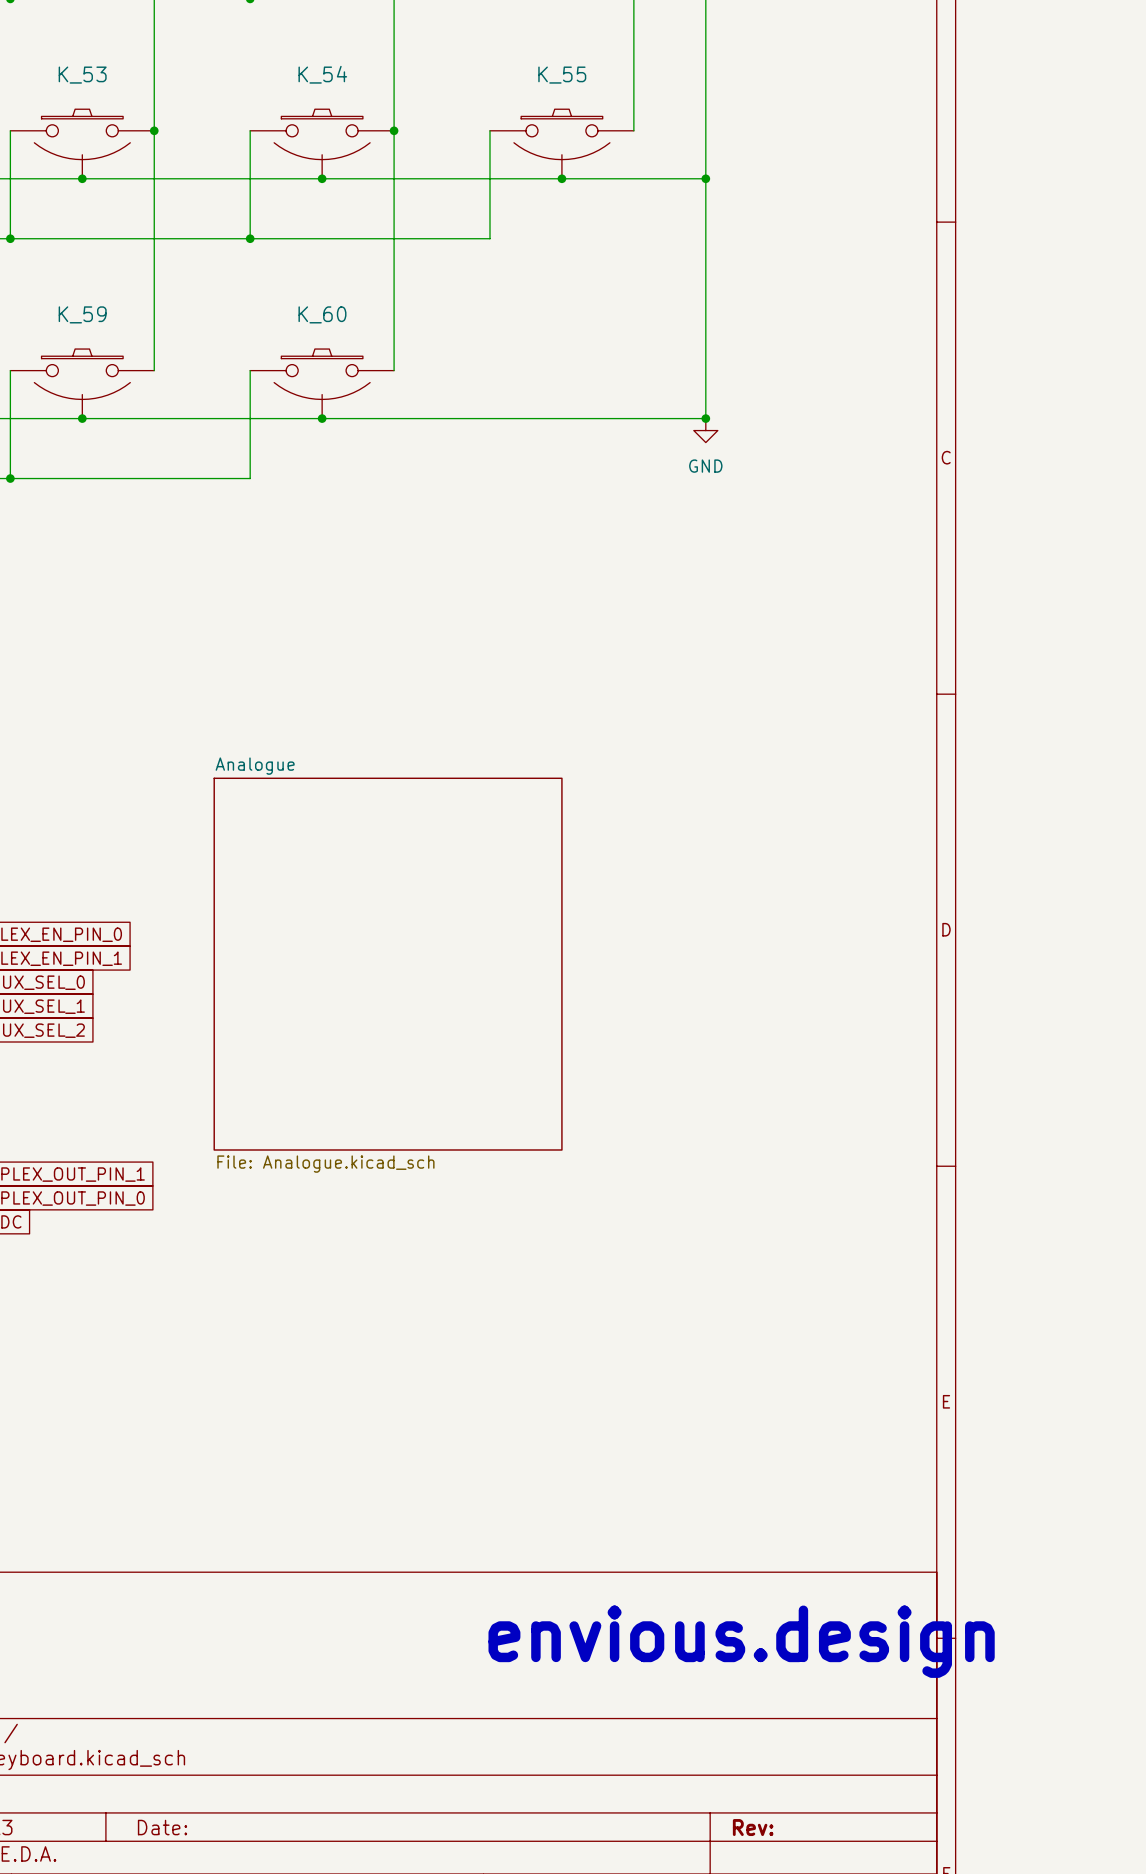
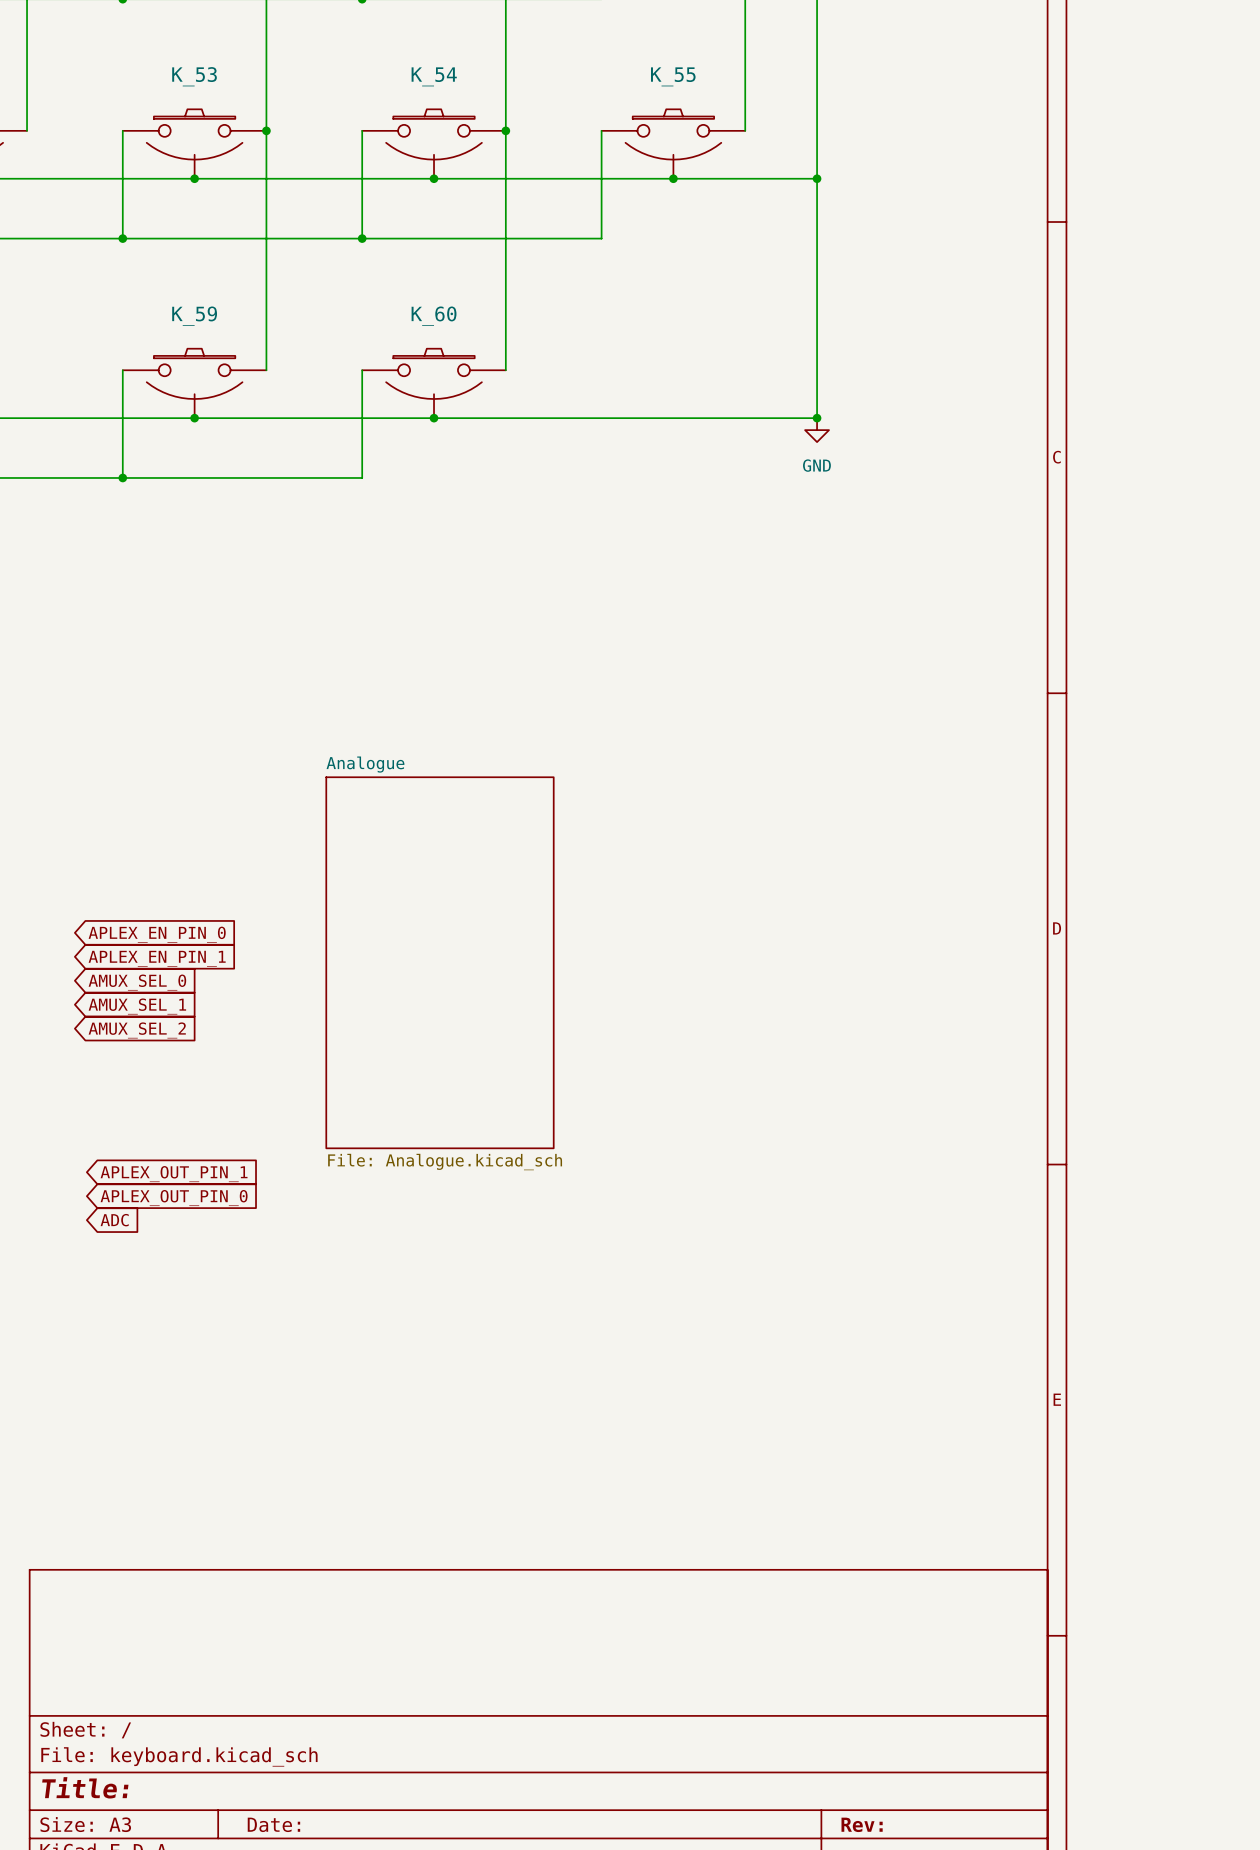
sheet Analogue: none -> File: Analogue.kicad_sch (439, 962)
sheet Analogue: File: Analogue.kicad_sch (388, 964) -> none
text: envious.design (741, 1641) -> none

